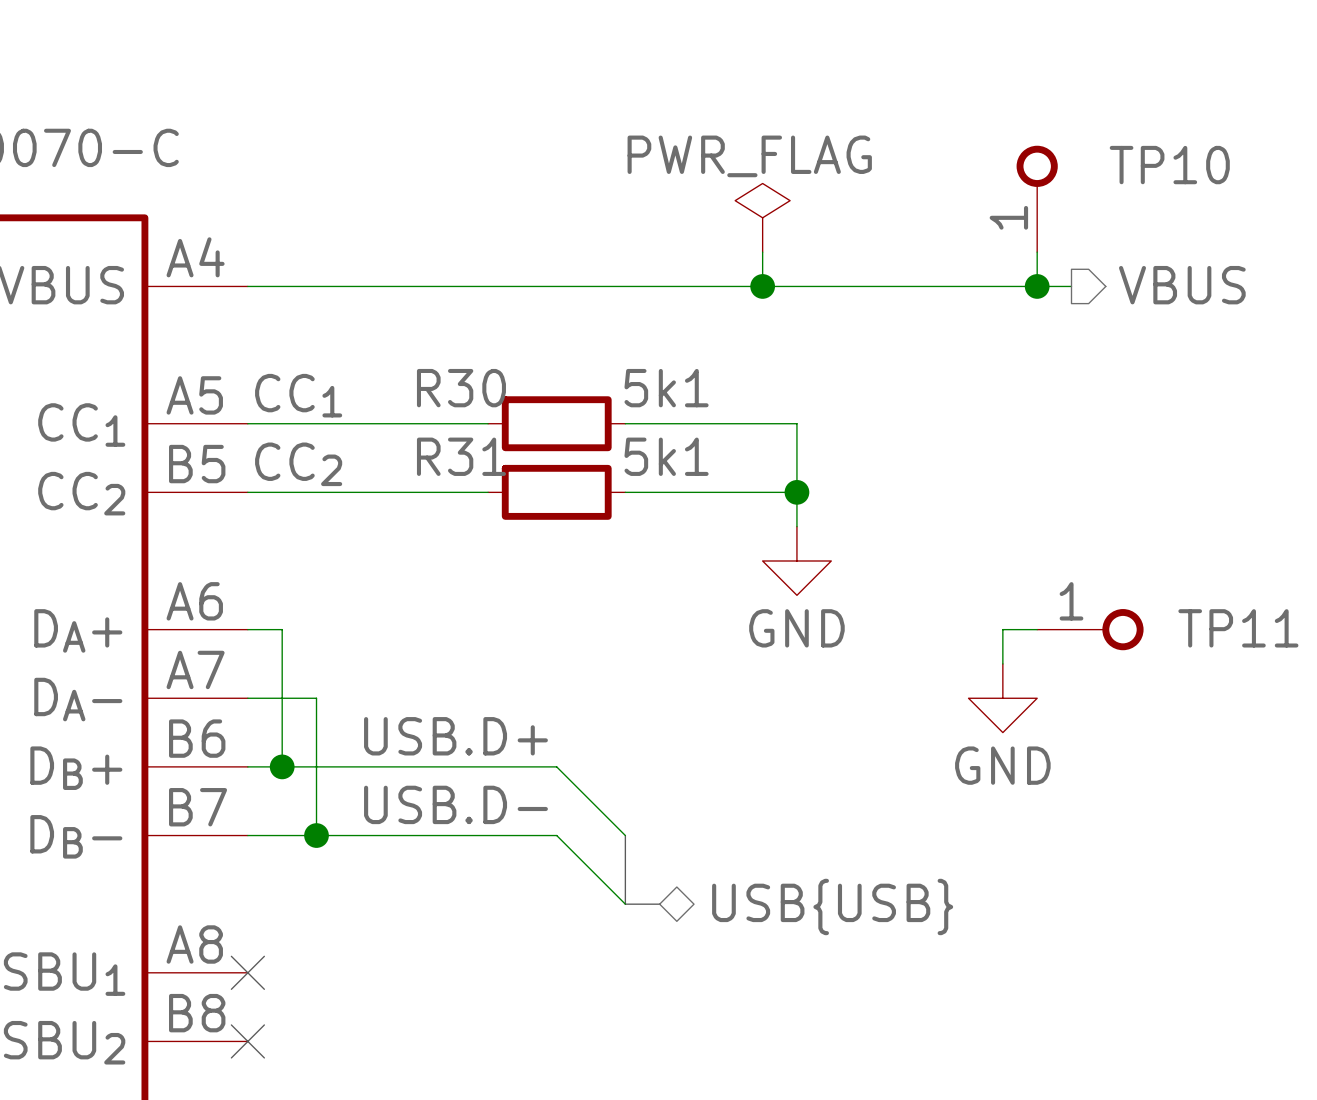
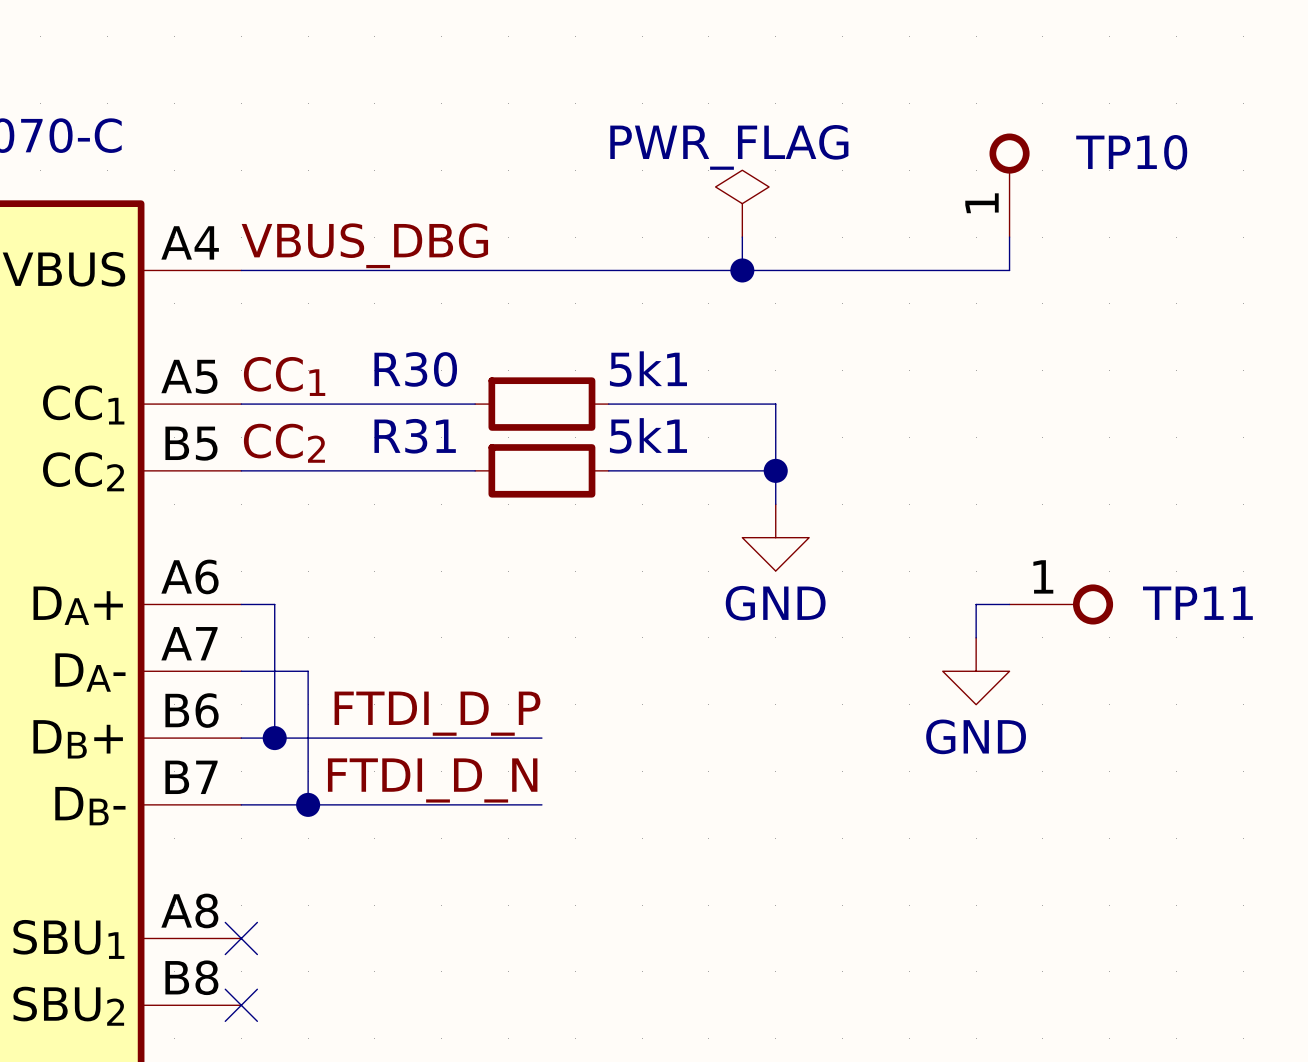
label: none -> VBUS_DBG (364, 245)
hierarchical label: VBUS (1182, 285) -> none
wire: (1037, 286) (1071, 286) -> none
junction: (1037, 286) -> none
R30 name position: R30 (461, 388) -> R30 (415, 369)
R31 name position: R31 (461, 456) -> R31 (415, 436)
label: USB.D+ (455, 736) -> FTDI_D_P (437, 713)
wire: (556, 766) (625, 835) -> none
label: USB.D- (455, 804) -> FTDI_D_N (432, 780)
wire: (556, 835) (625, 904) -> none
bus: (625, 835) (625, 904) (659, 904) -> none
hierarchical label: USB{USB} (832, 906) -> none

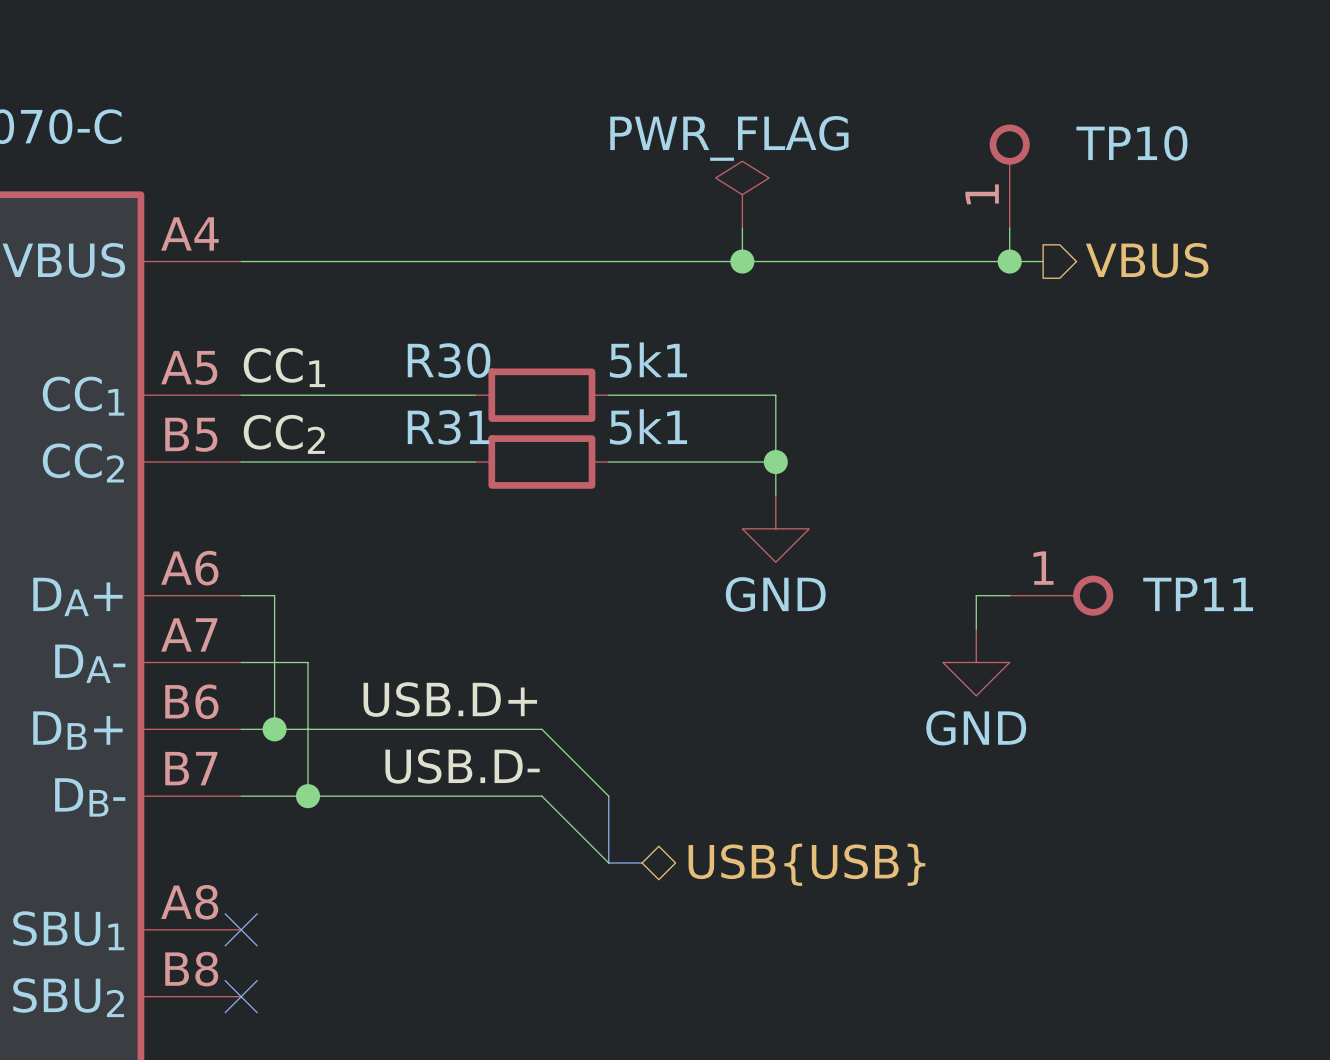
label: VBUS_DBG (364, 245) -> none
hierarchical label: none -> VBUS (1147, 260)
wire: none -> (1009, 261) (1043, 261)
junction: none -> (1009, 261)
R30 name position: R30 (415, 369) -> R30 (449, 360)
R31 name position: R31 (415, 436) -> R31 (448, 427)
label: FTDI_D_P (437, 713) -> USB.D+ (450, 699)
wire: none -> (541, 729) (608, 796)
label: FTDI_D_N (432, 780) -> USB.D- (462, 766)
wire: none -> (541, 796) (608, 862)
bus: none -> (608, 796) (608, 862) (642, 862)
hierarchical label: none -> USB{USB} (806, 864)

